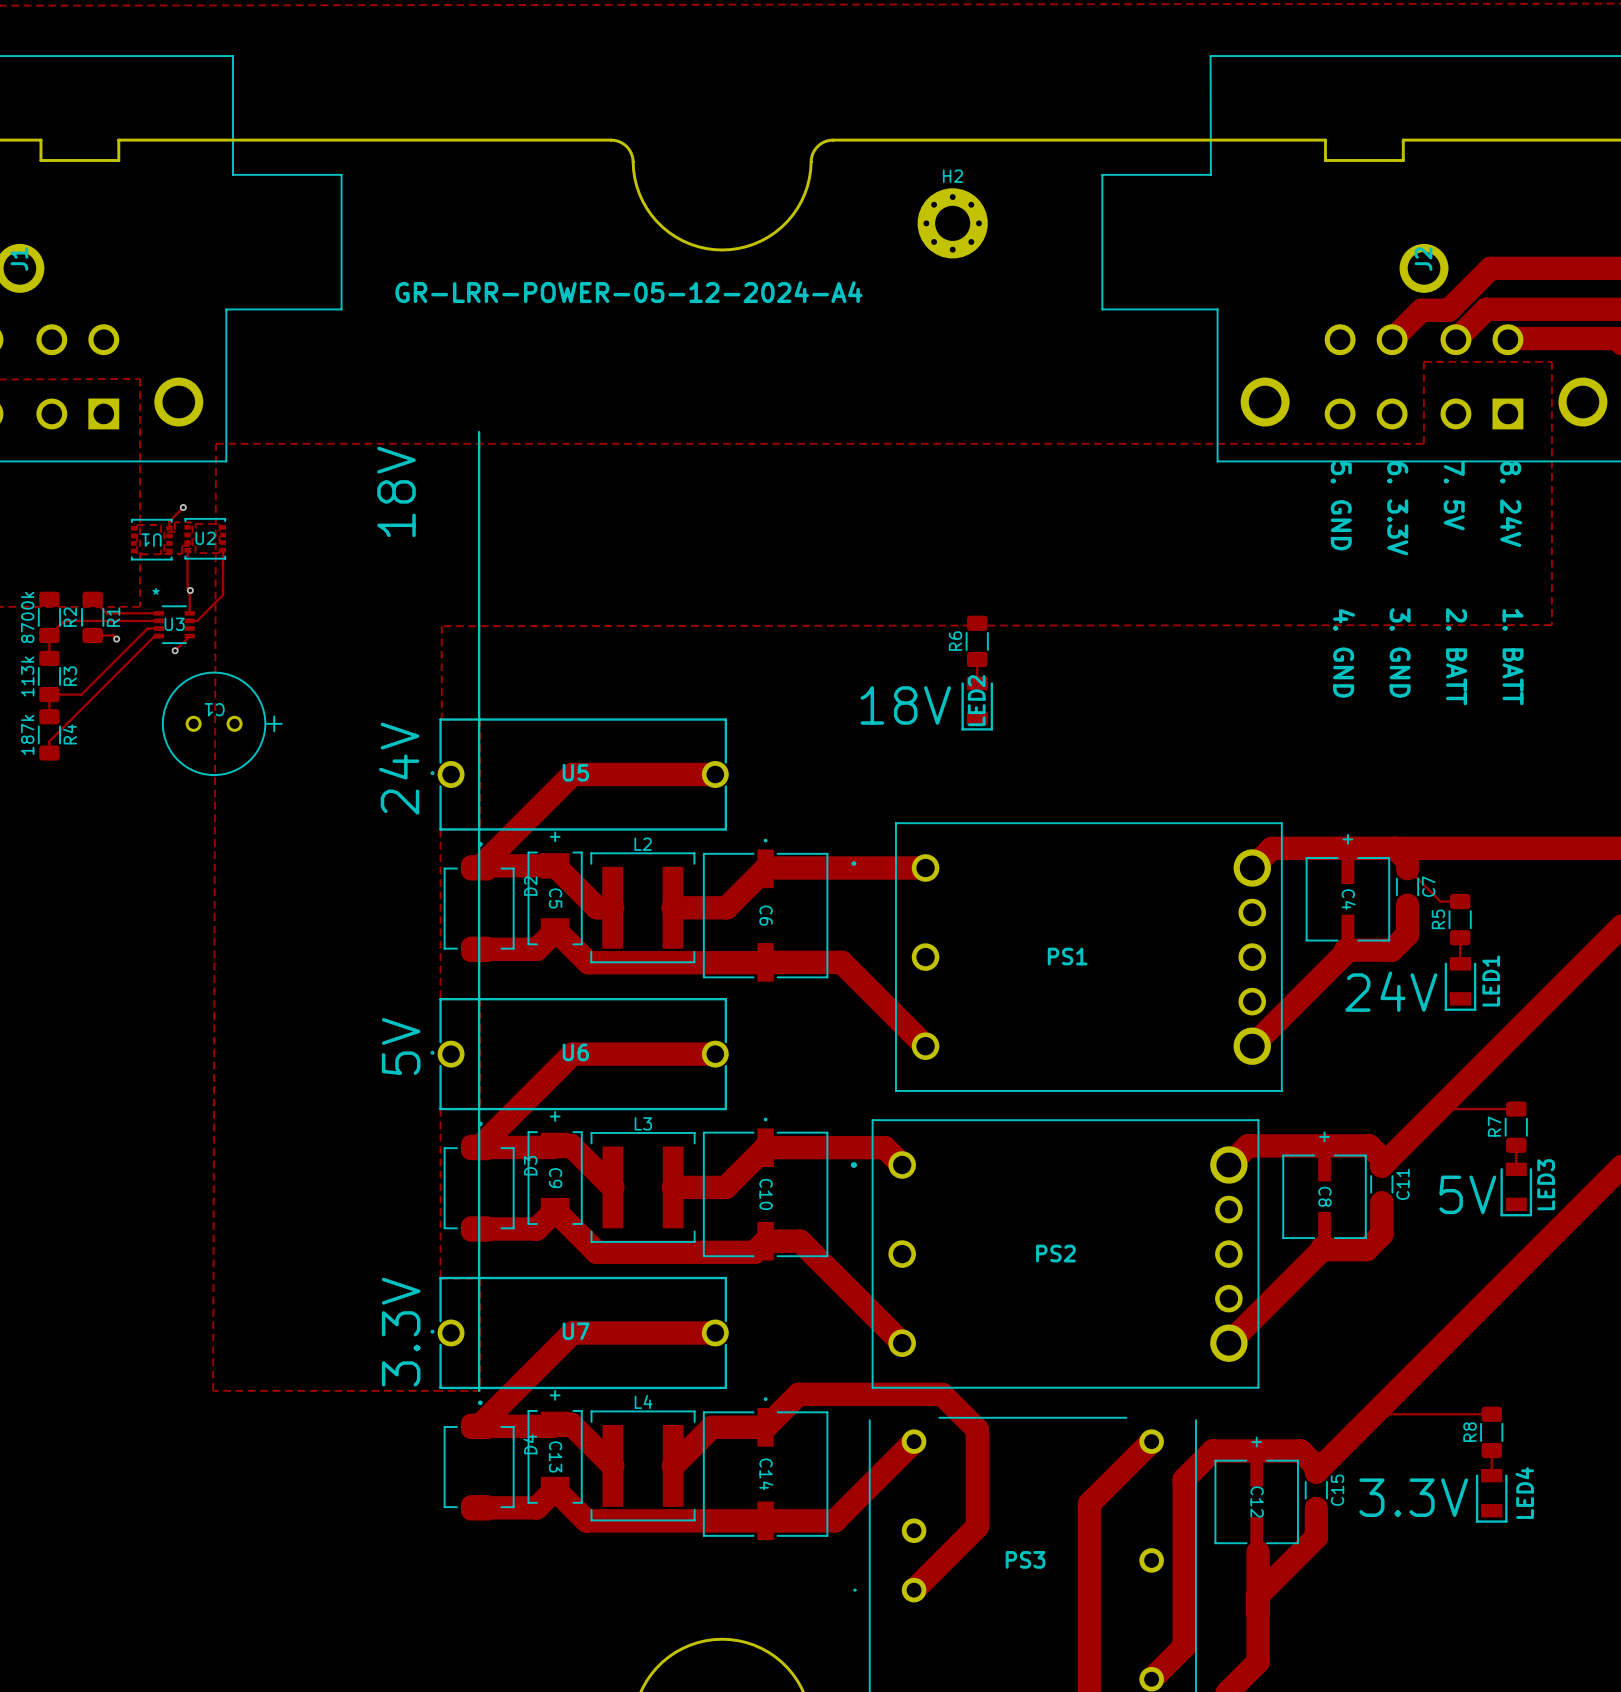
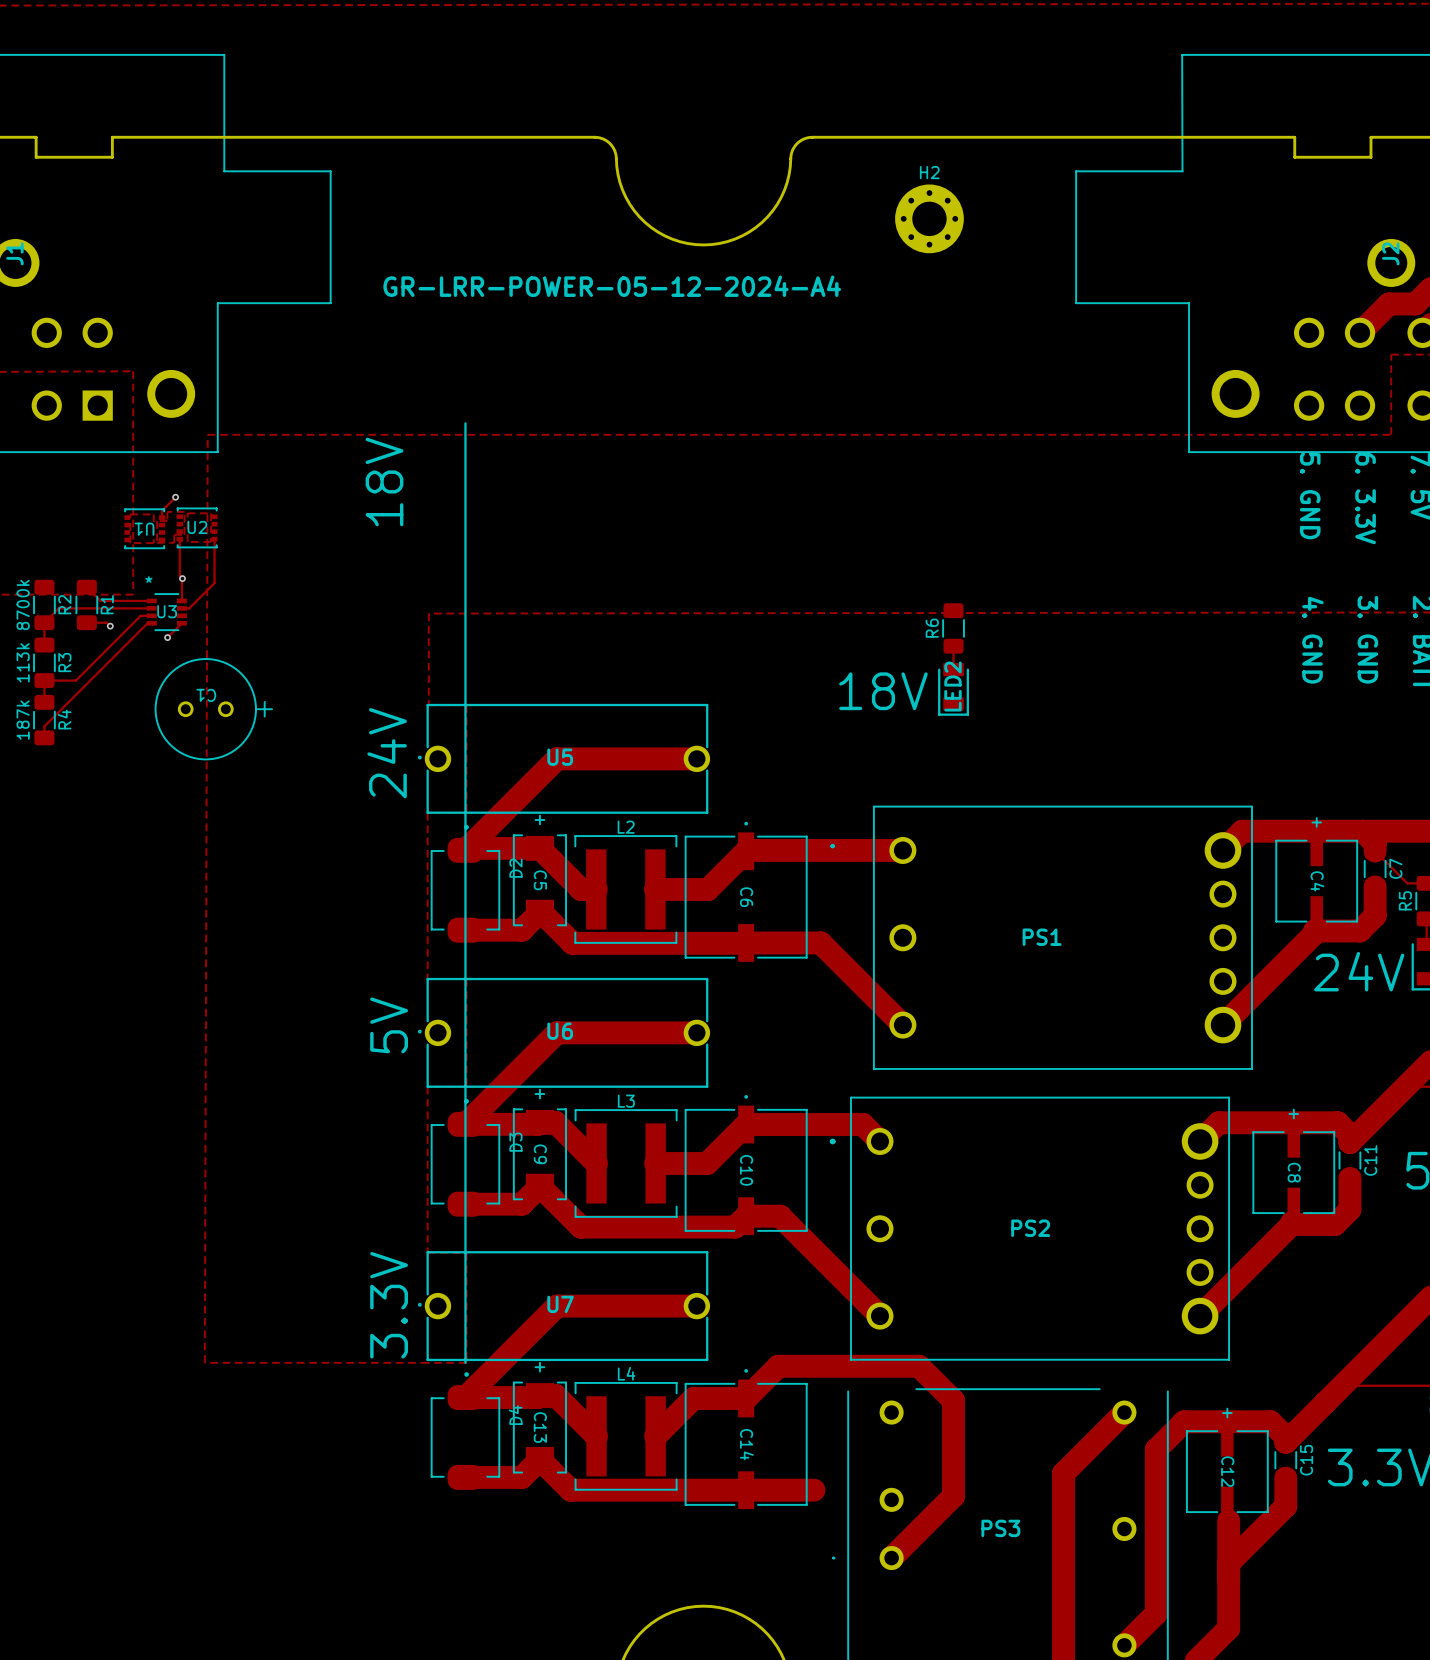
track: (914, 1441) (834, 1520) -> none

